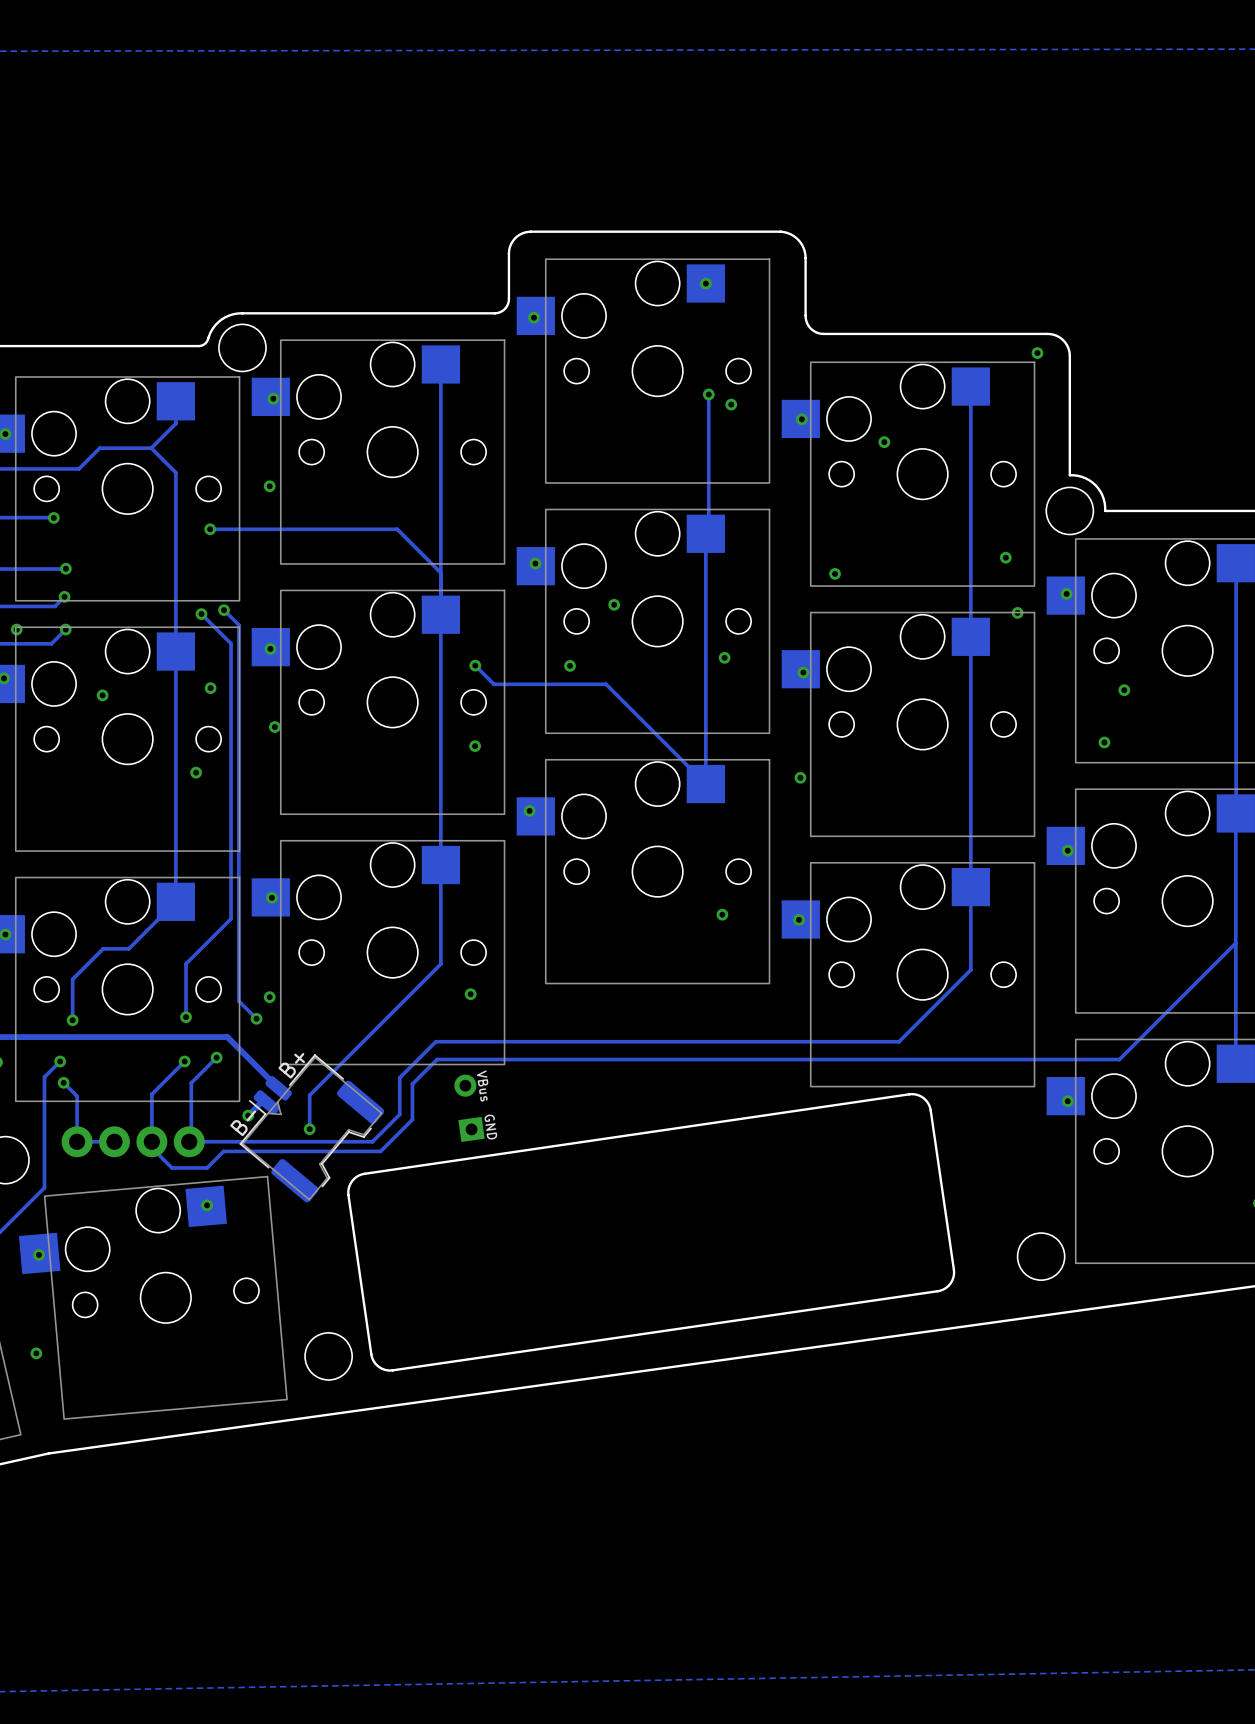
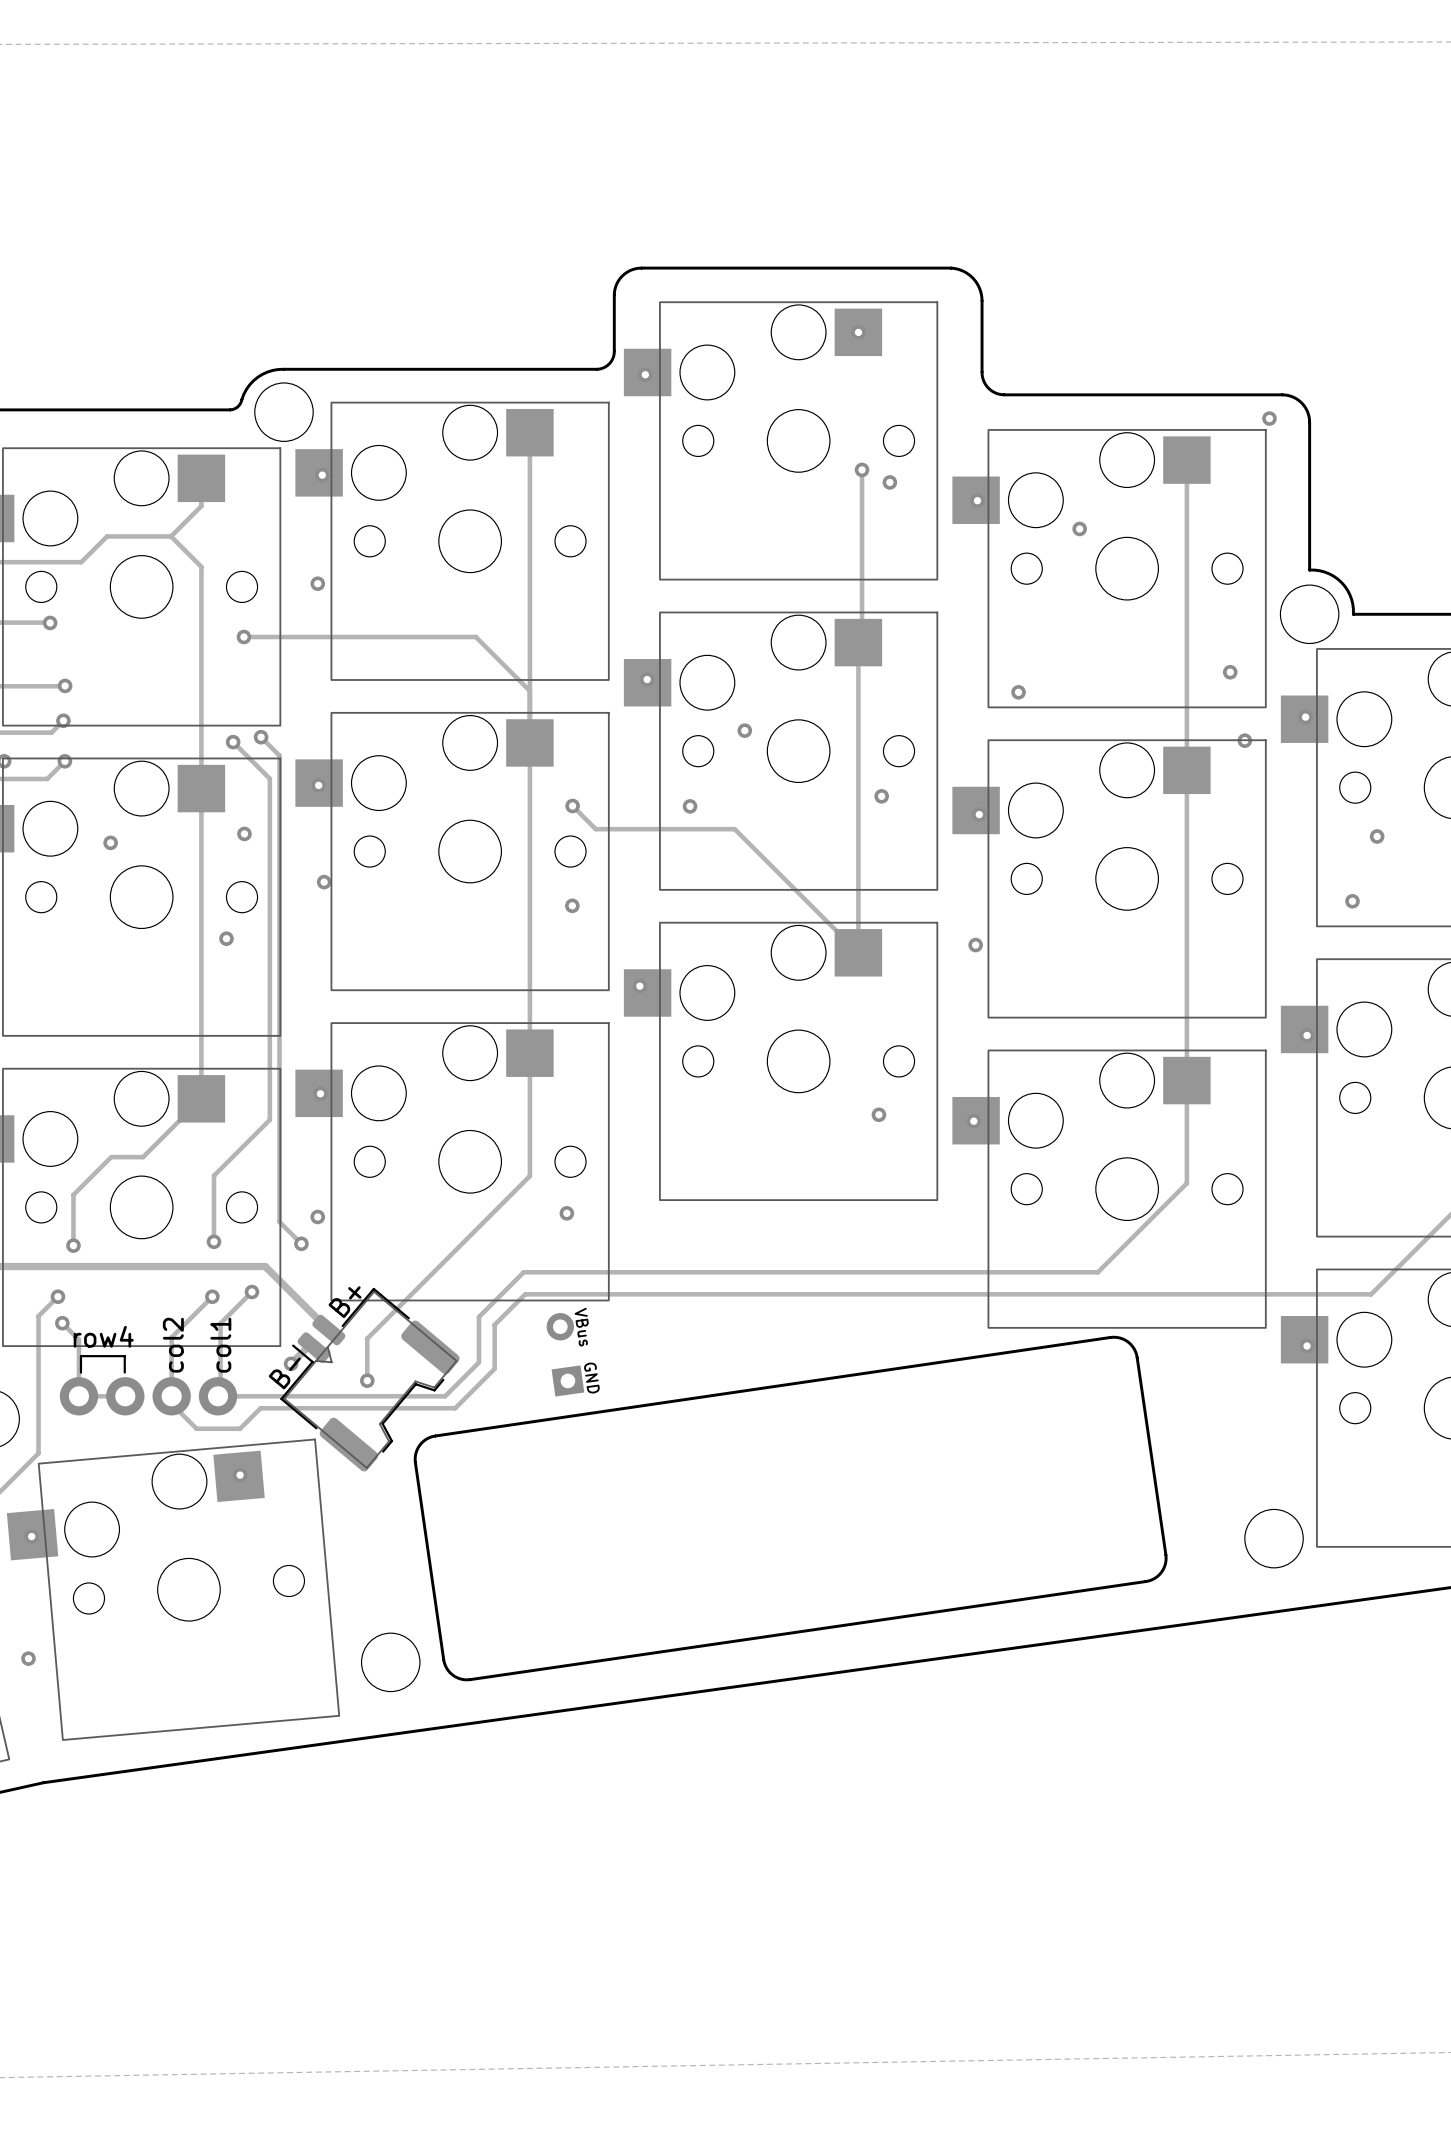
part footprint: [61, 1126, 205, 1158] -> [59, 1355, 238, 1416]

